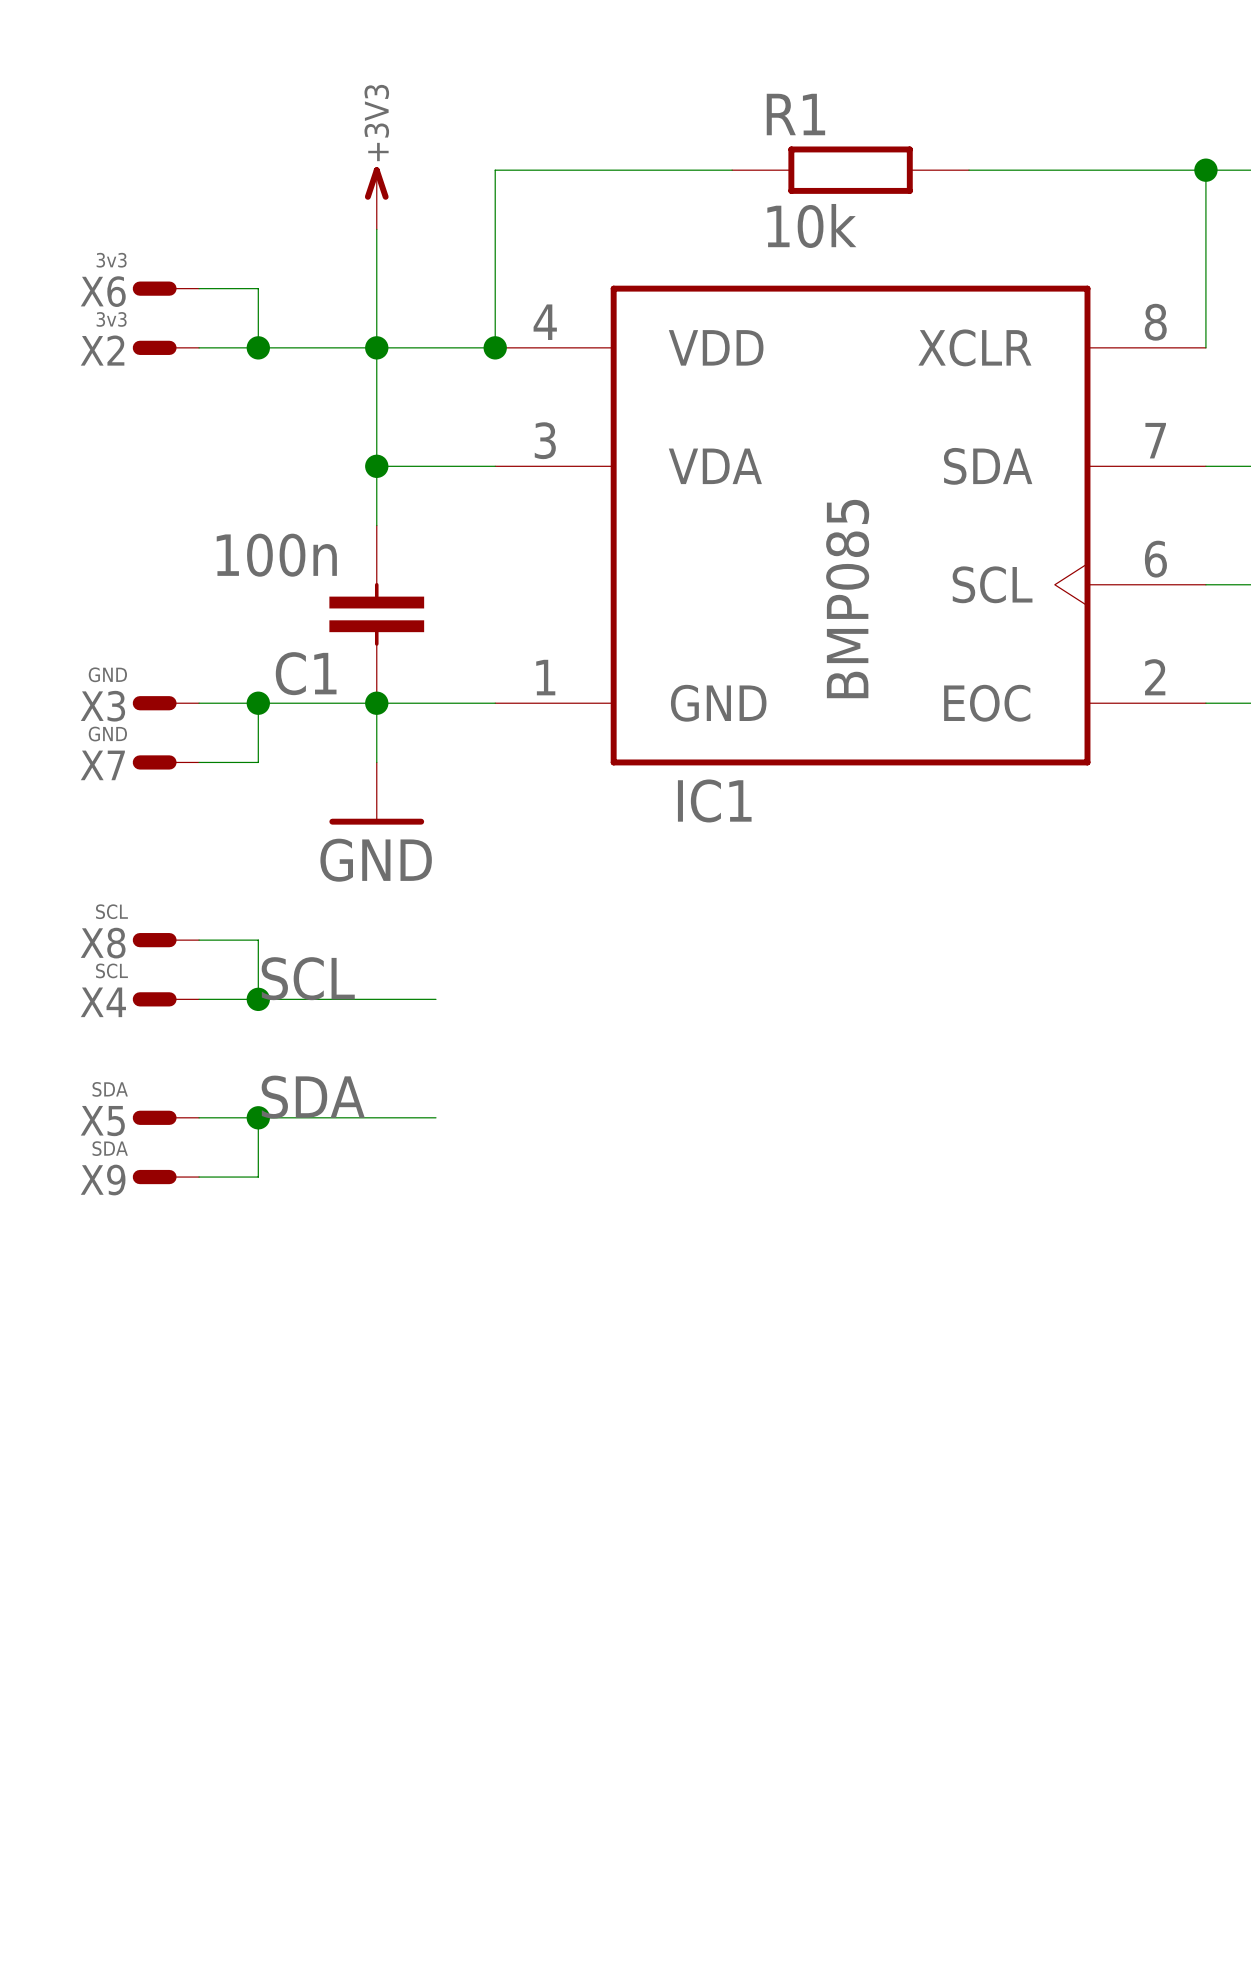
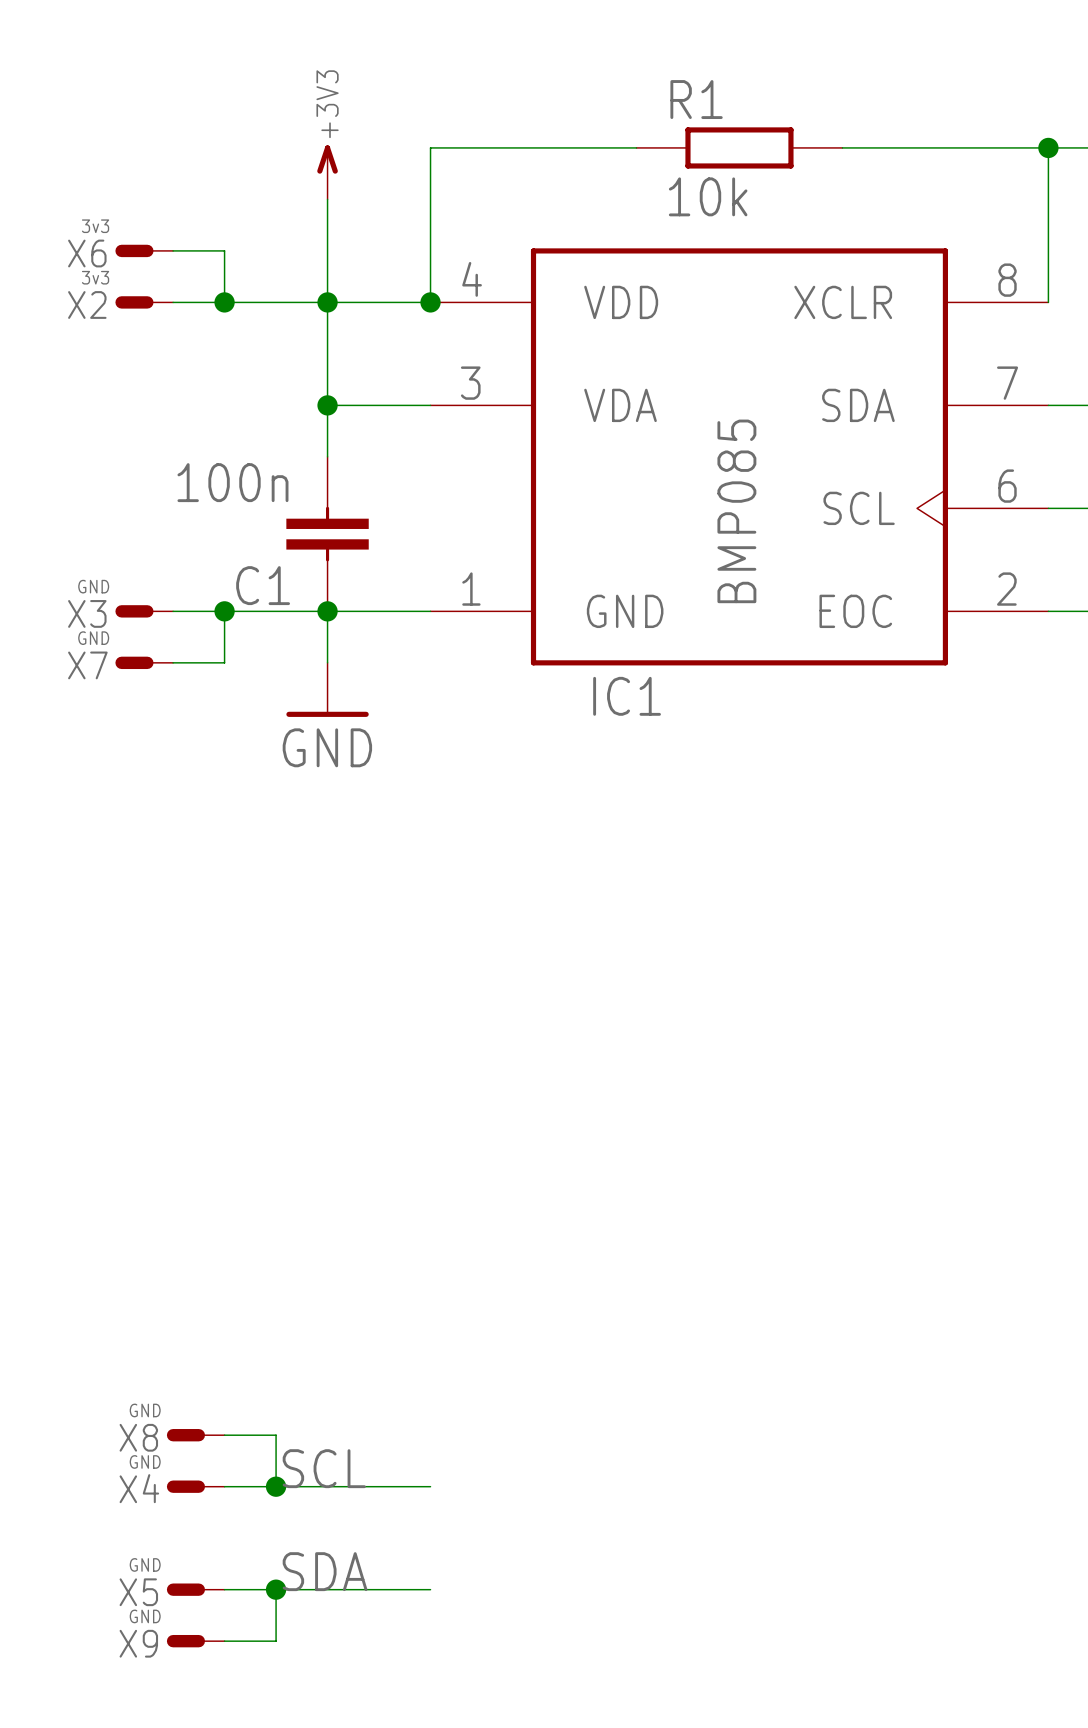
X8 value: SCL (111, 911) -> GND (145, 1410)
X8 position: (165, 940) -> (195, 1435)
wire: (199, 940) (258, 940) (258, 999) -> none
X4 value: SCL (111, 970) -> GND (145, 1461)
label: SCL (308, 978) -> none
X4 position: (165, 999) -> (195, 1486)
wire: (199, 999) (435, 999) -> none
junction: (258, 999) -> none
X5 value: SDA (110, 1089) -> GND (145, 1564)
label: SDA (313, 1097) -> none
X5 position: (165, 1117) -> (195, 1589)
wire: (199, 1117) (435, 1117) -> none
wire: (258, 1117) (258, 1177) (199, 1177) -> none
junction: (258, 1117) -> none
X9 value: SDA (110, 1148) -> GND (145, 1616)
X9 position: (165, 1177) -> (195, 1641)
wire: none -> (224, 1435) (276, 1435) (276, 1486)
label: none -> SCL (324, 1468)
wire: none -> (224, 1486) (430, 1486)
junction: none -> (276, 1486)
label: none -> SDA (325, 1571)
wire: none -> (224, 1589) (430, 1589)
wire: none -> (276, 1589) (276, 1641) (224, 1641)
junction: none -> (276, 1589)

